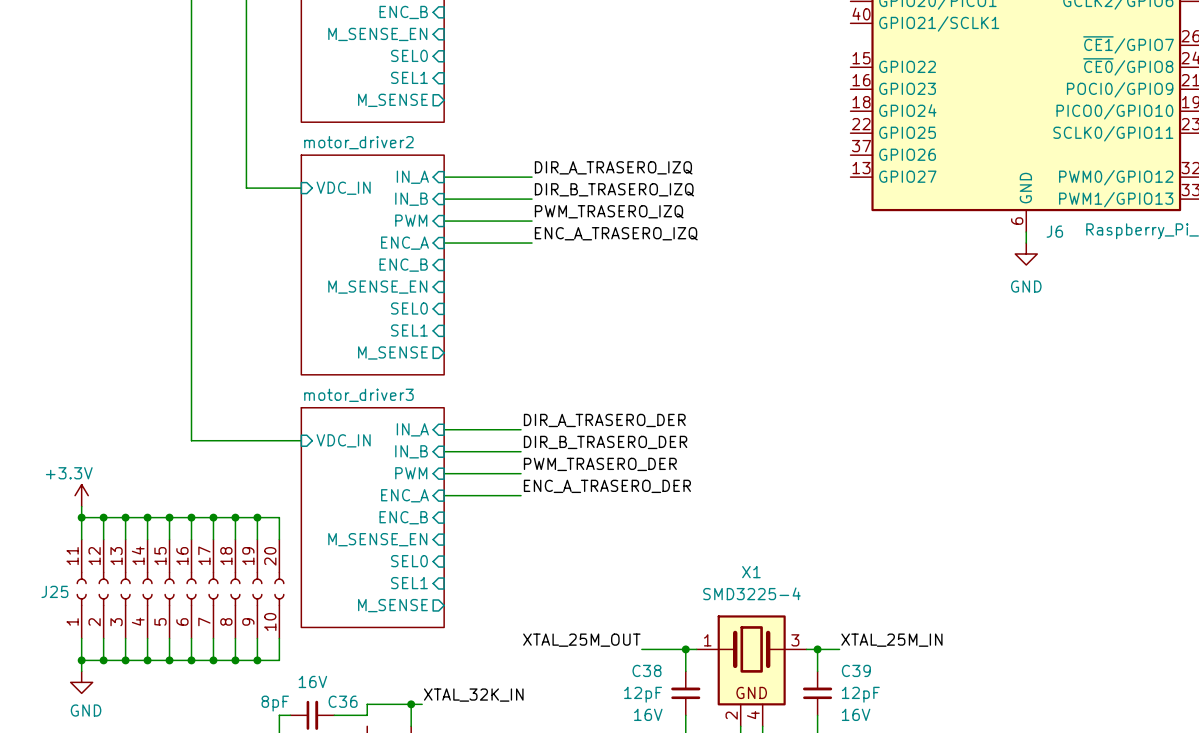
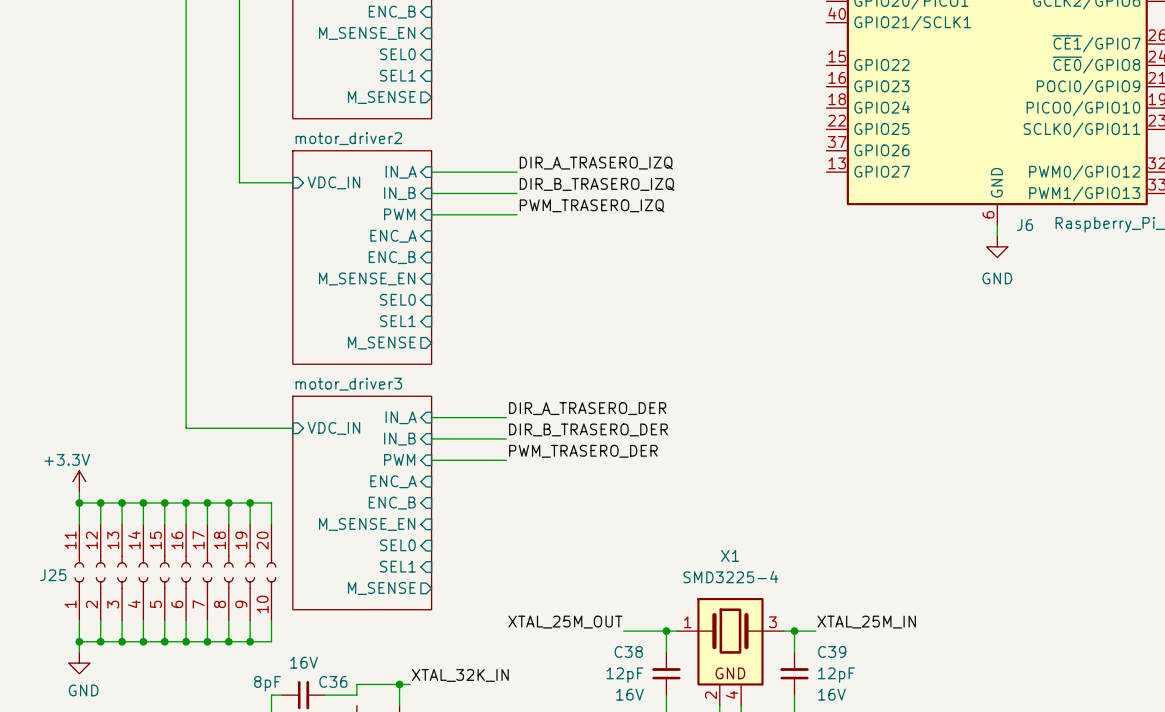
label: ENC_A_TRASERO_IZQ (616, 233) -> none
wire: (444, 243) (532, 243) -> none
label: ENC_A_TRASERO_DER (607, 486) -> none
wire: (444, 495) (521, 495) -> none

